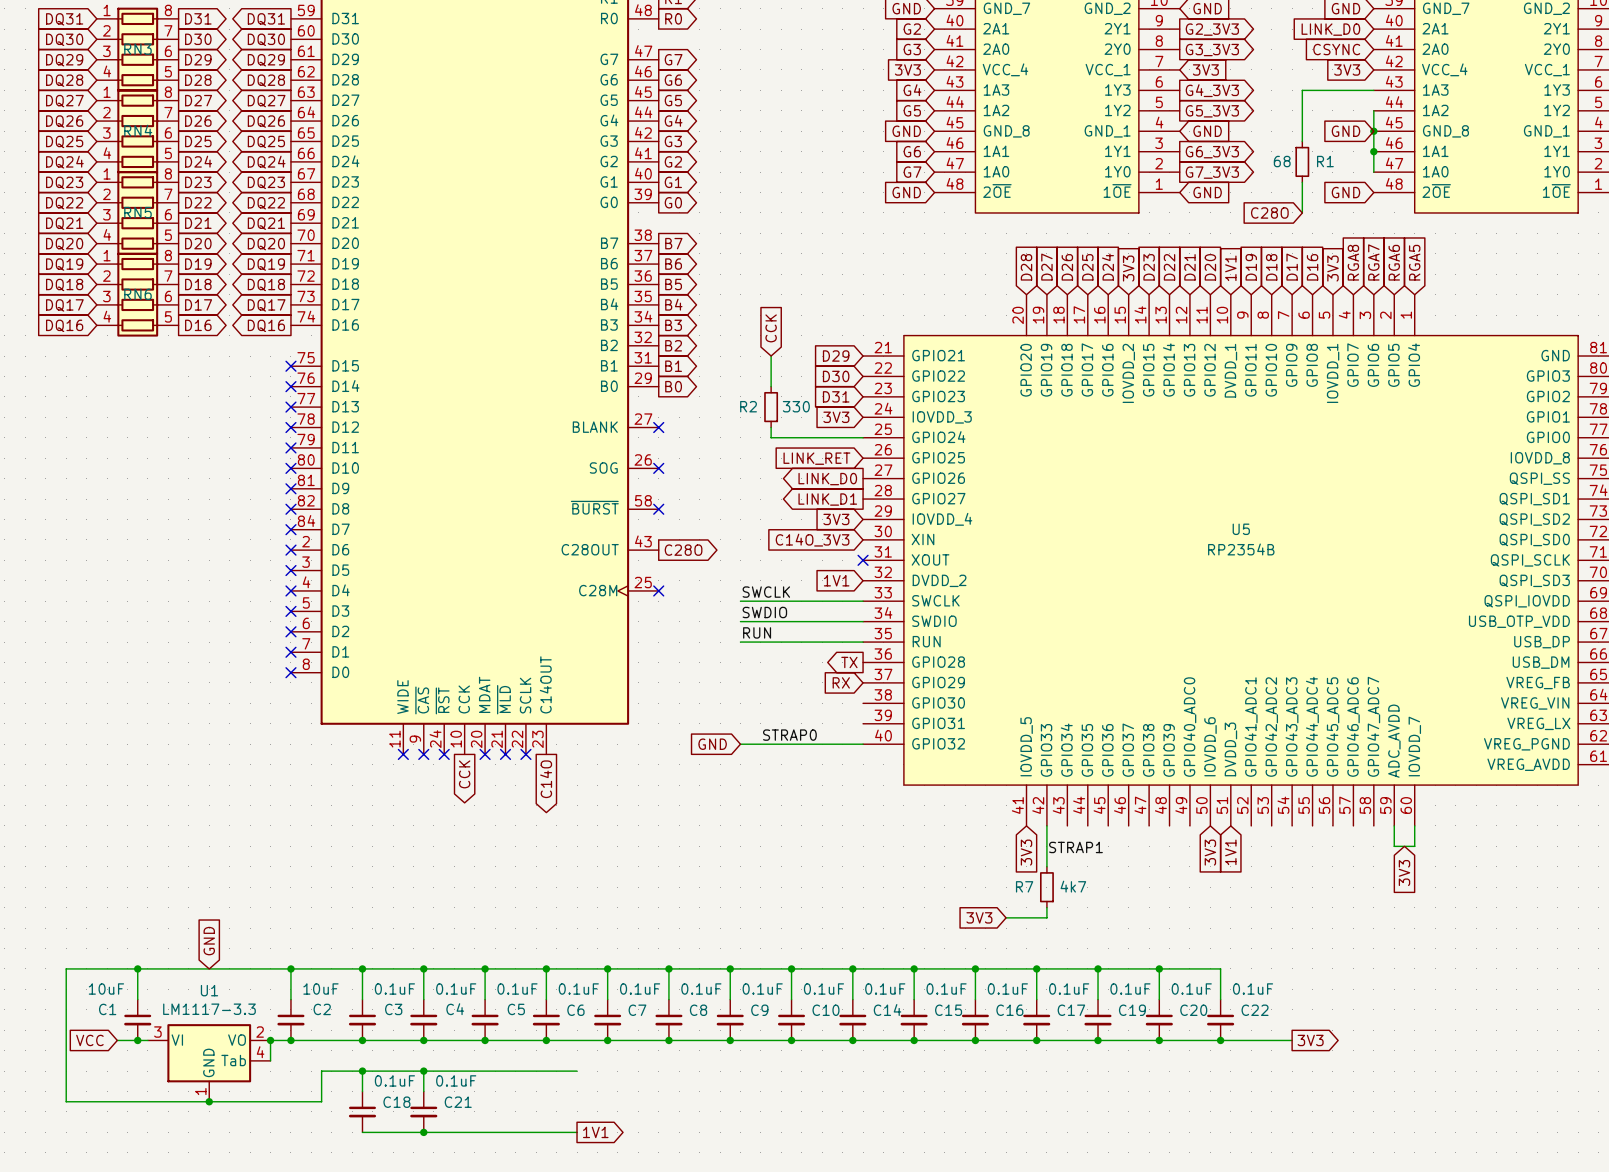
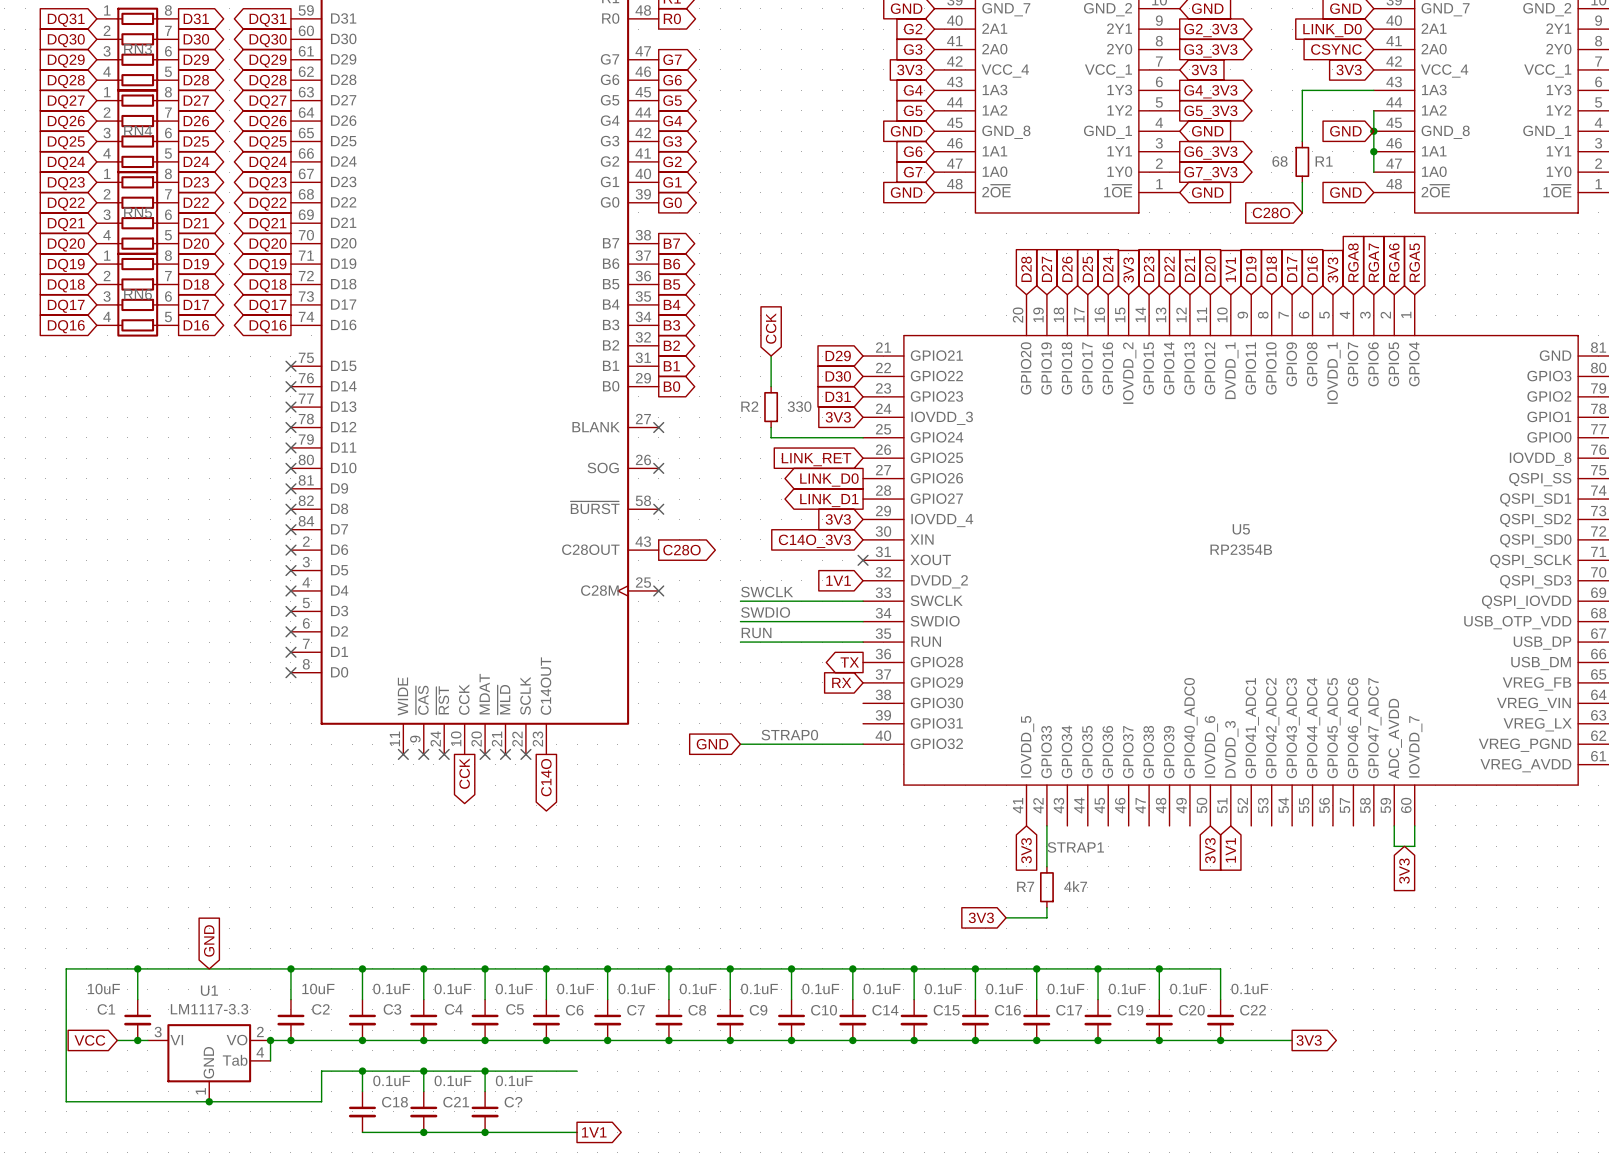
wire: none -> (485, 1071) (485, 1091)
junction: none -> (485, 1071)
C?: none -> 0.1uF (485, 1111)
junction: none -> (485, 1132)

